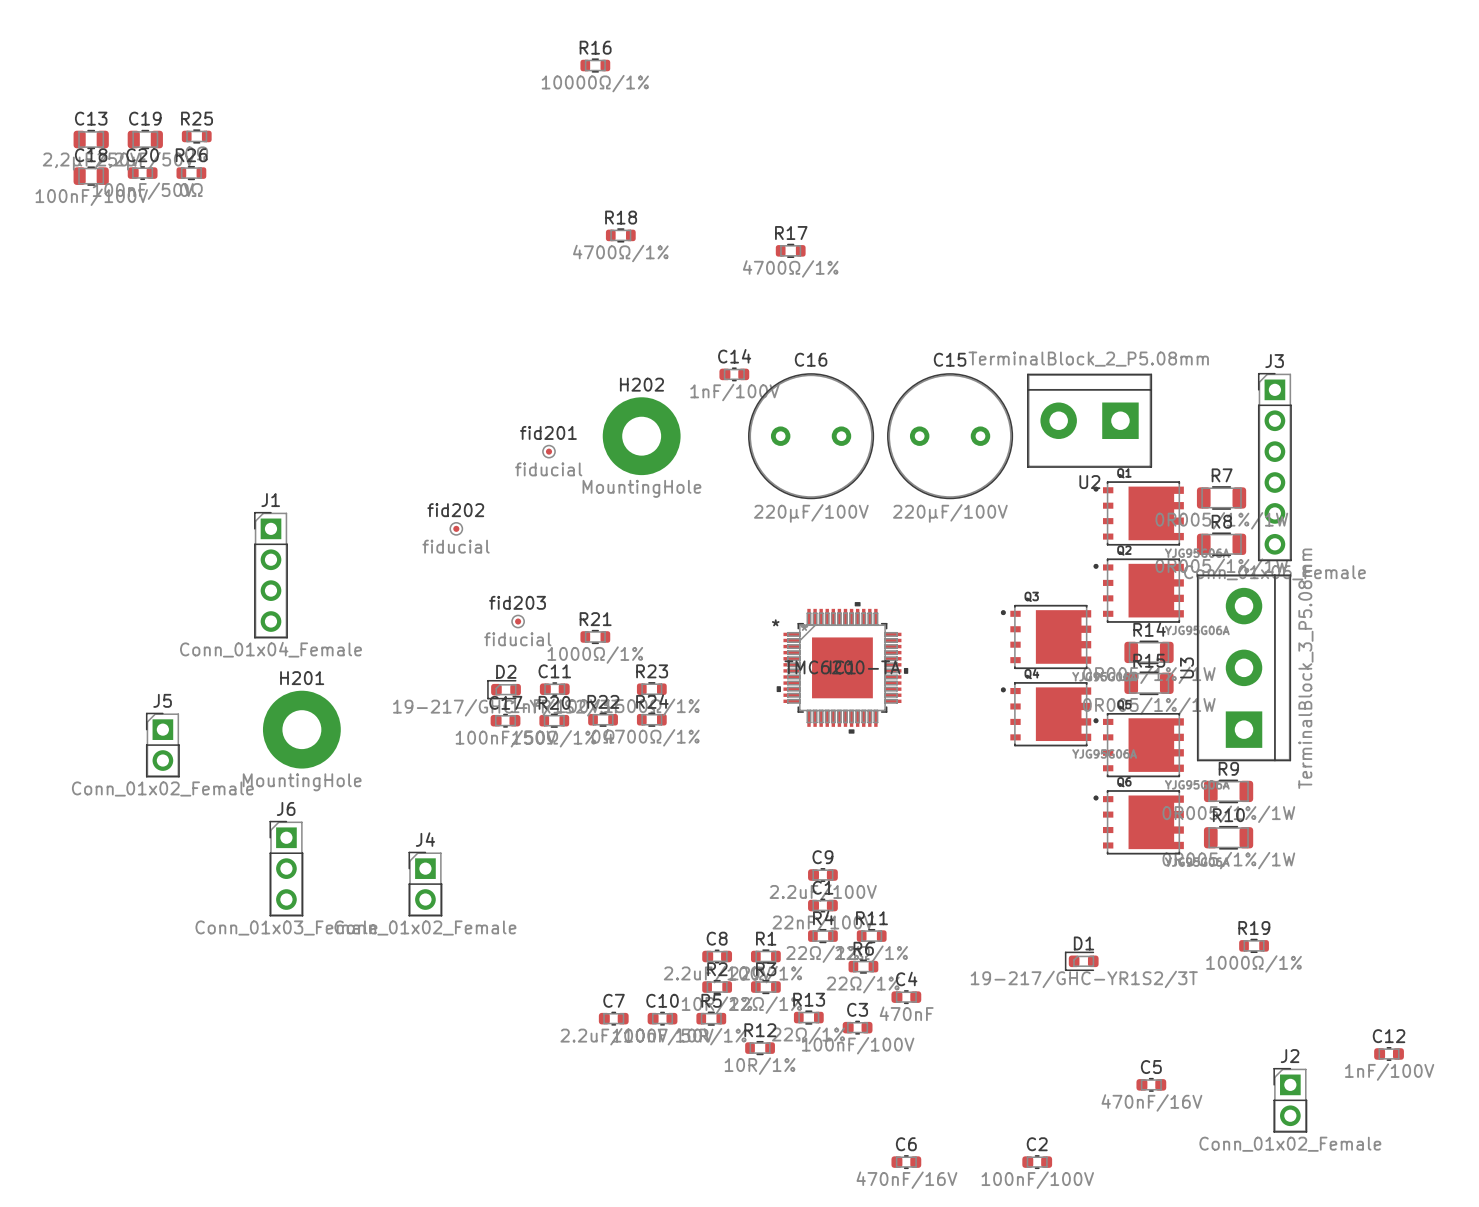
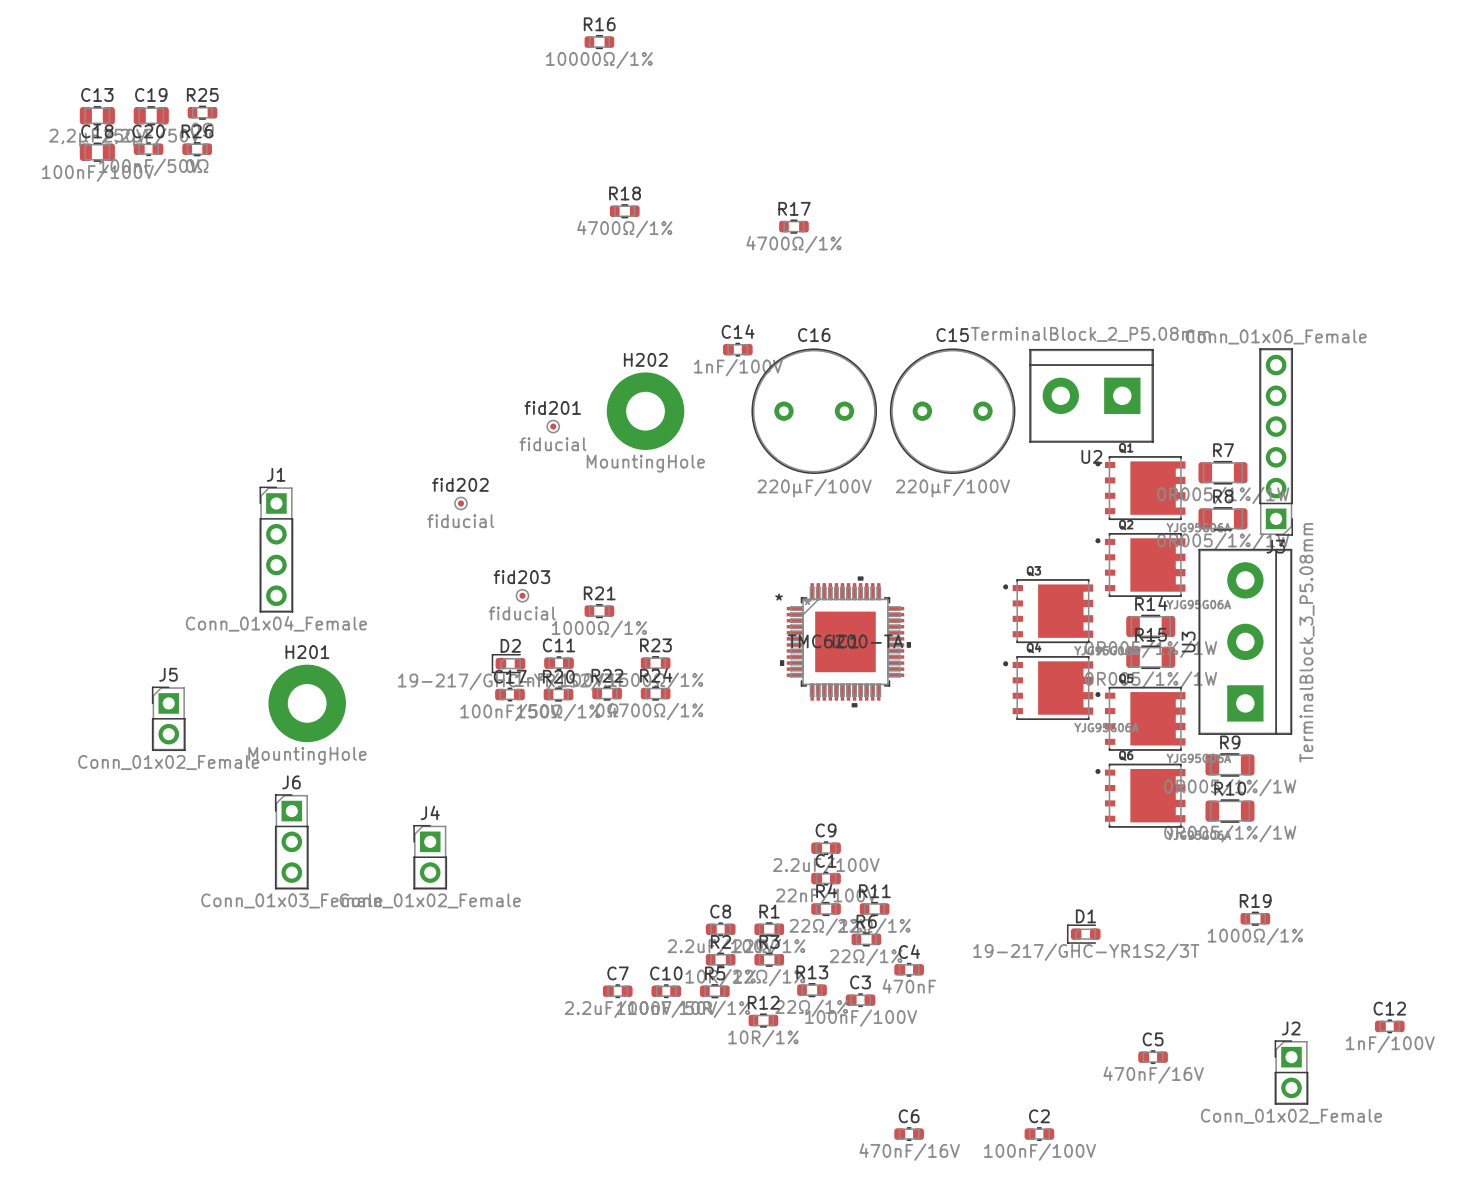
J3 rotation: 0° (1274, 467) -> 180° (1276, 441)

